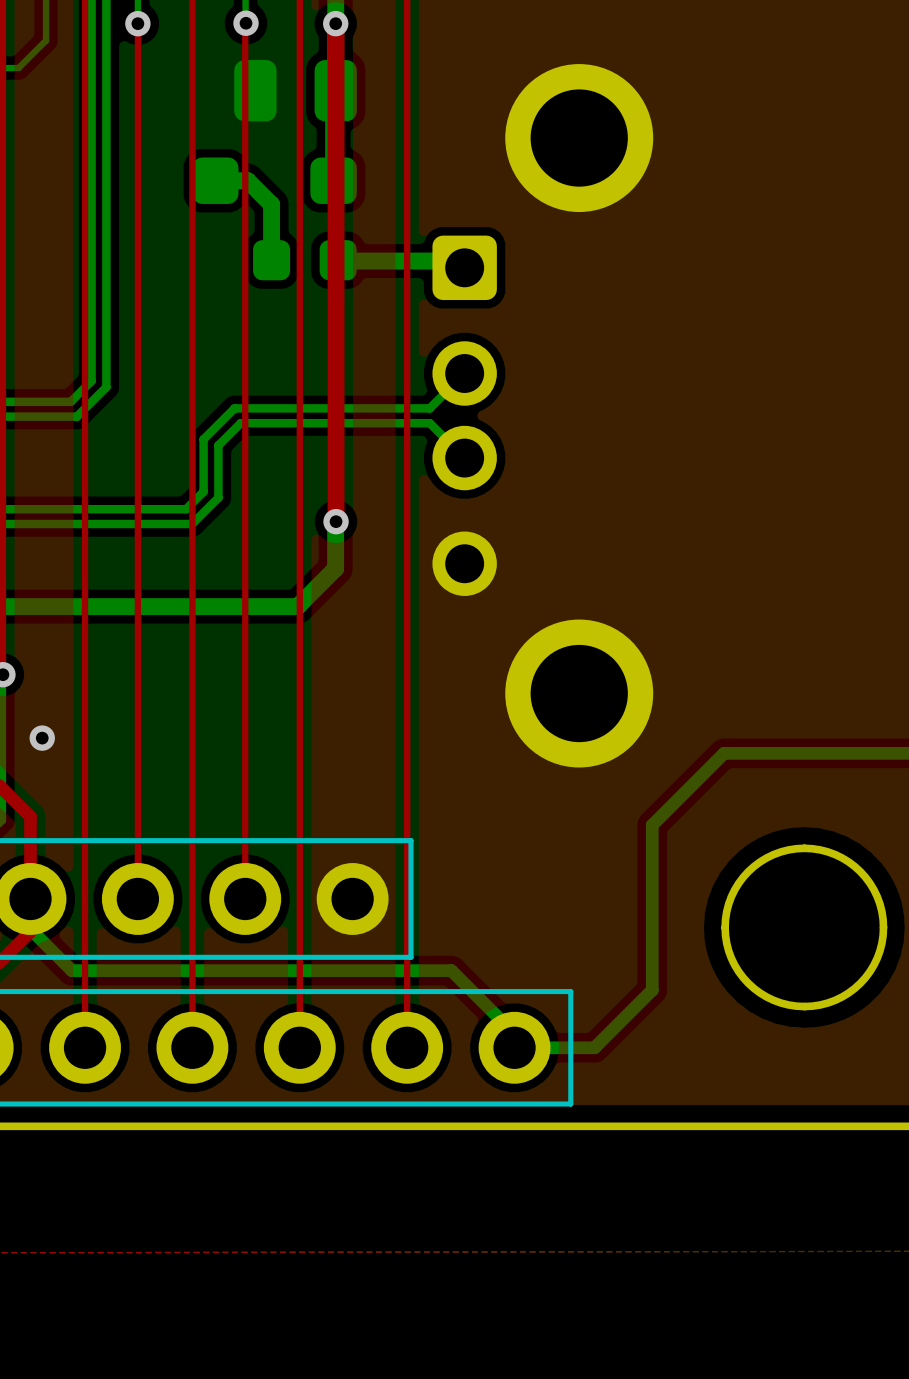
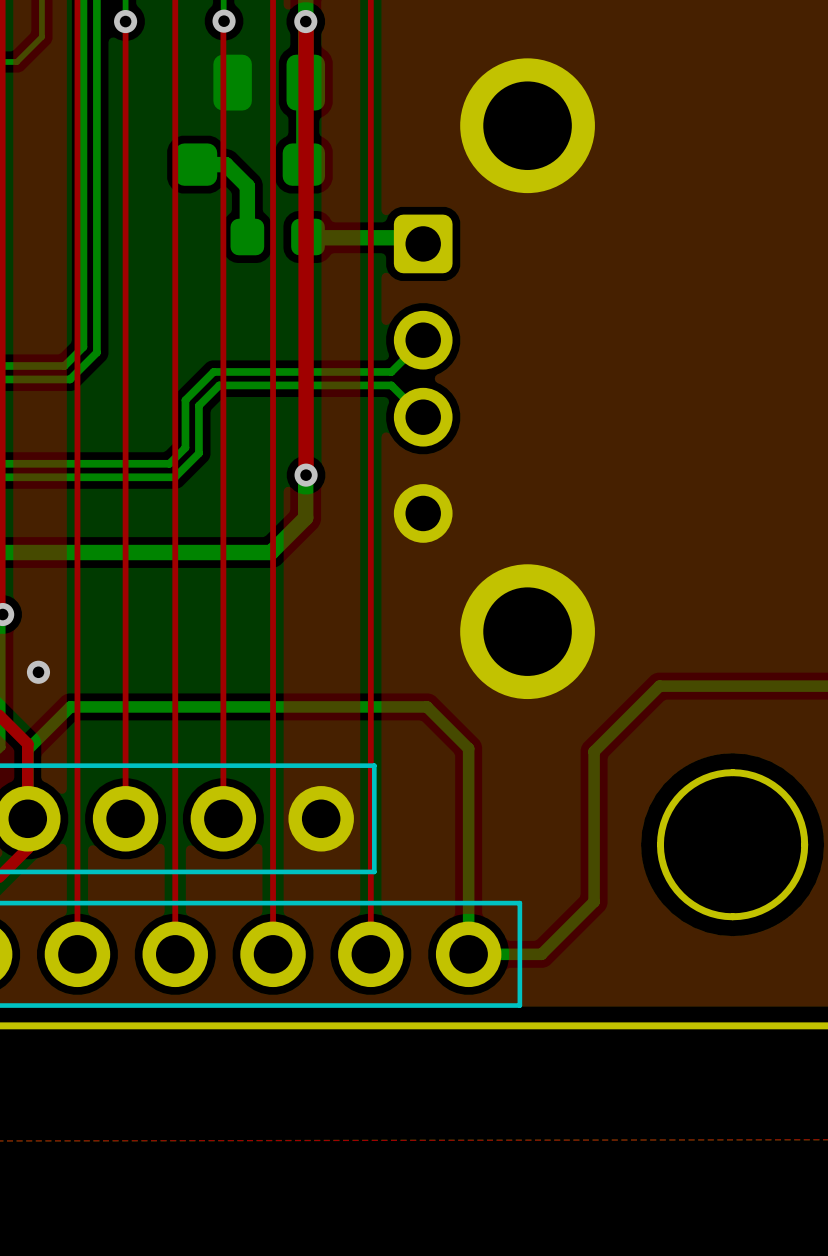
bottom track: (30, 898) (30, 929) (71, 970) (451, 970) (514, 1033) -> (27, 818) (27, 749) (70, 706) (426, 706) (468, 748) (468, 941)

